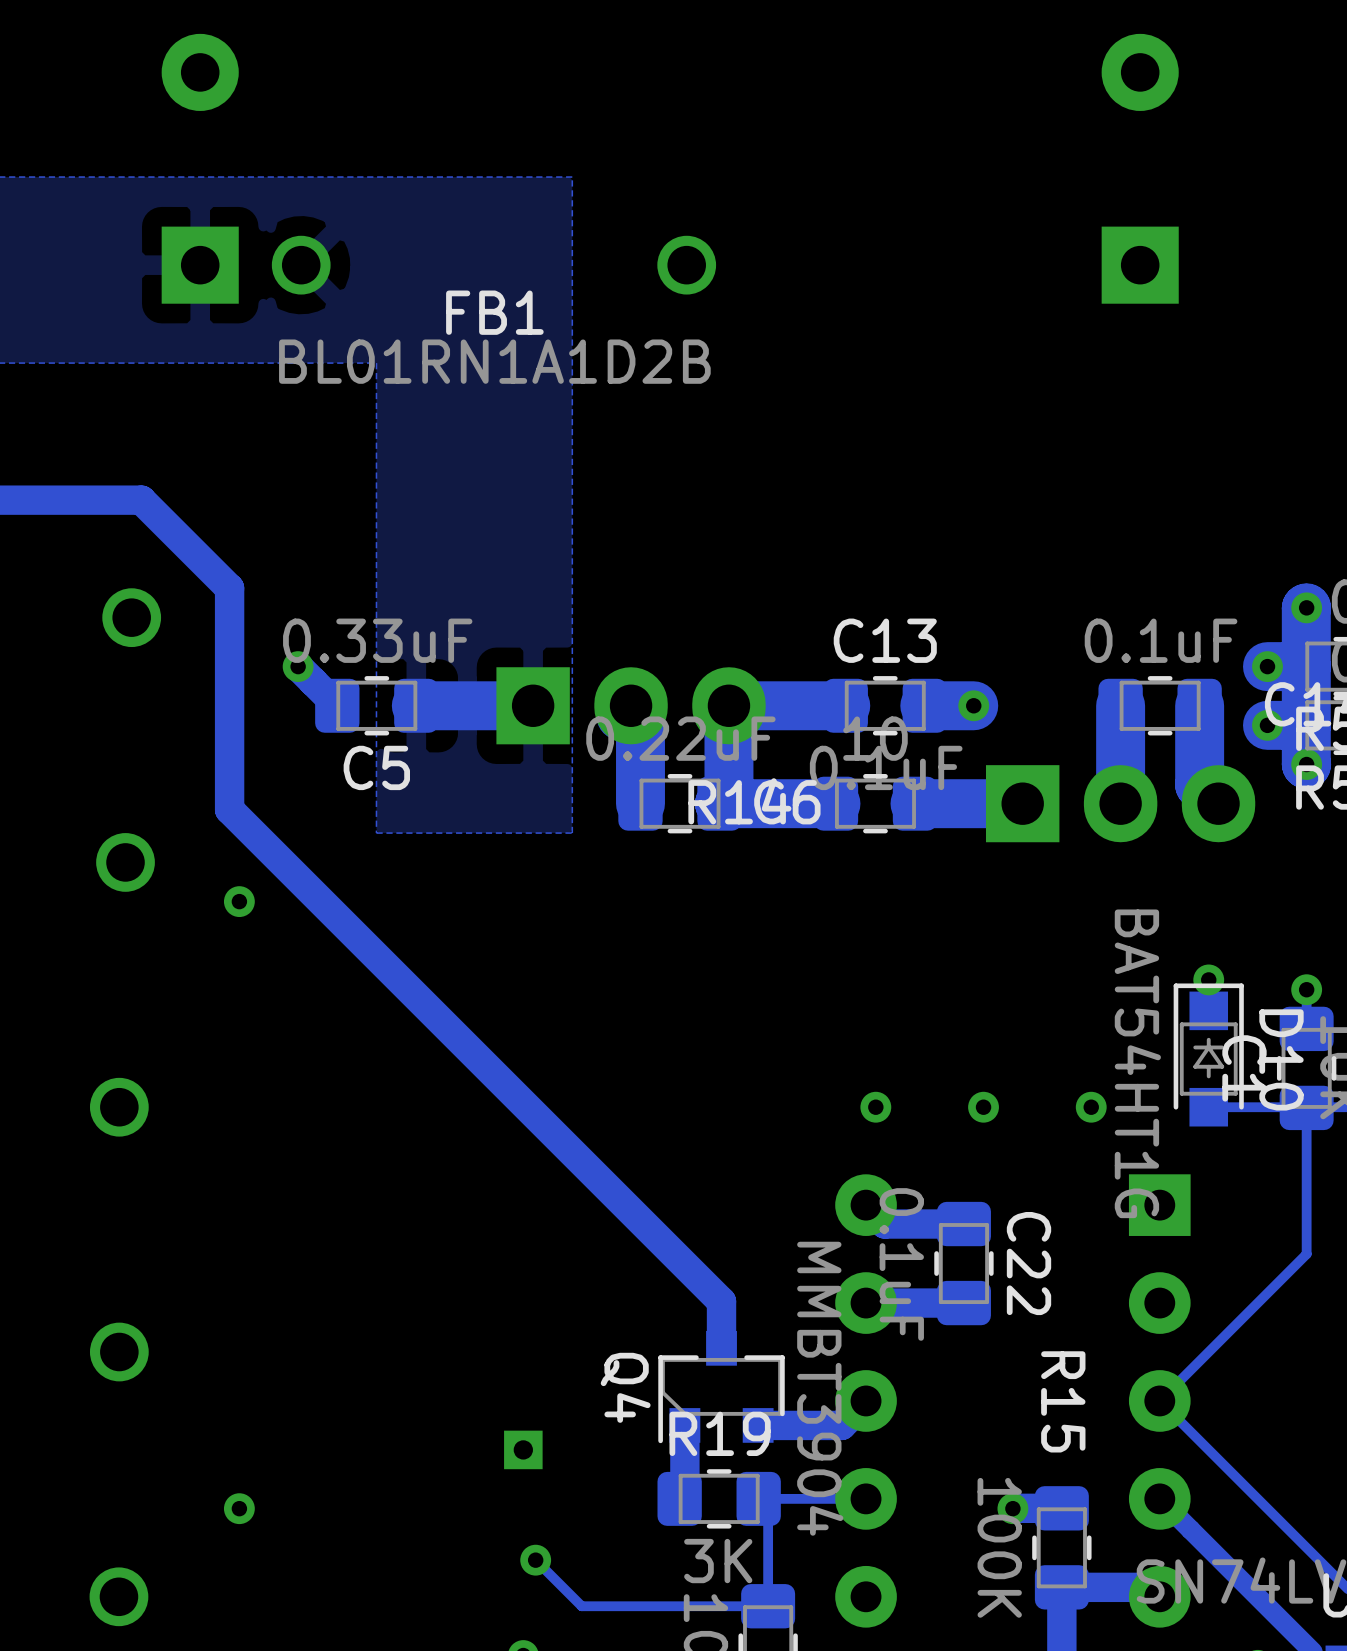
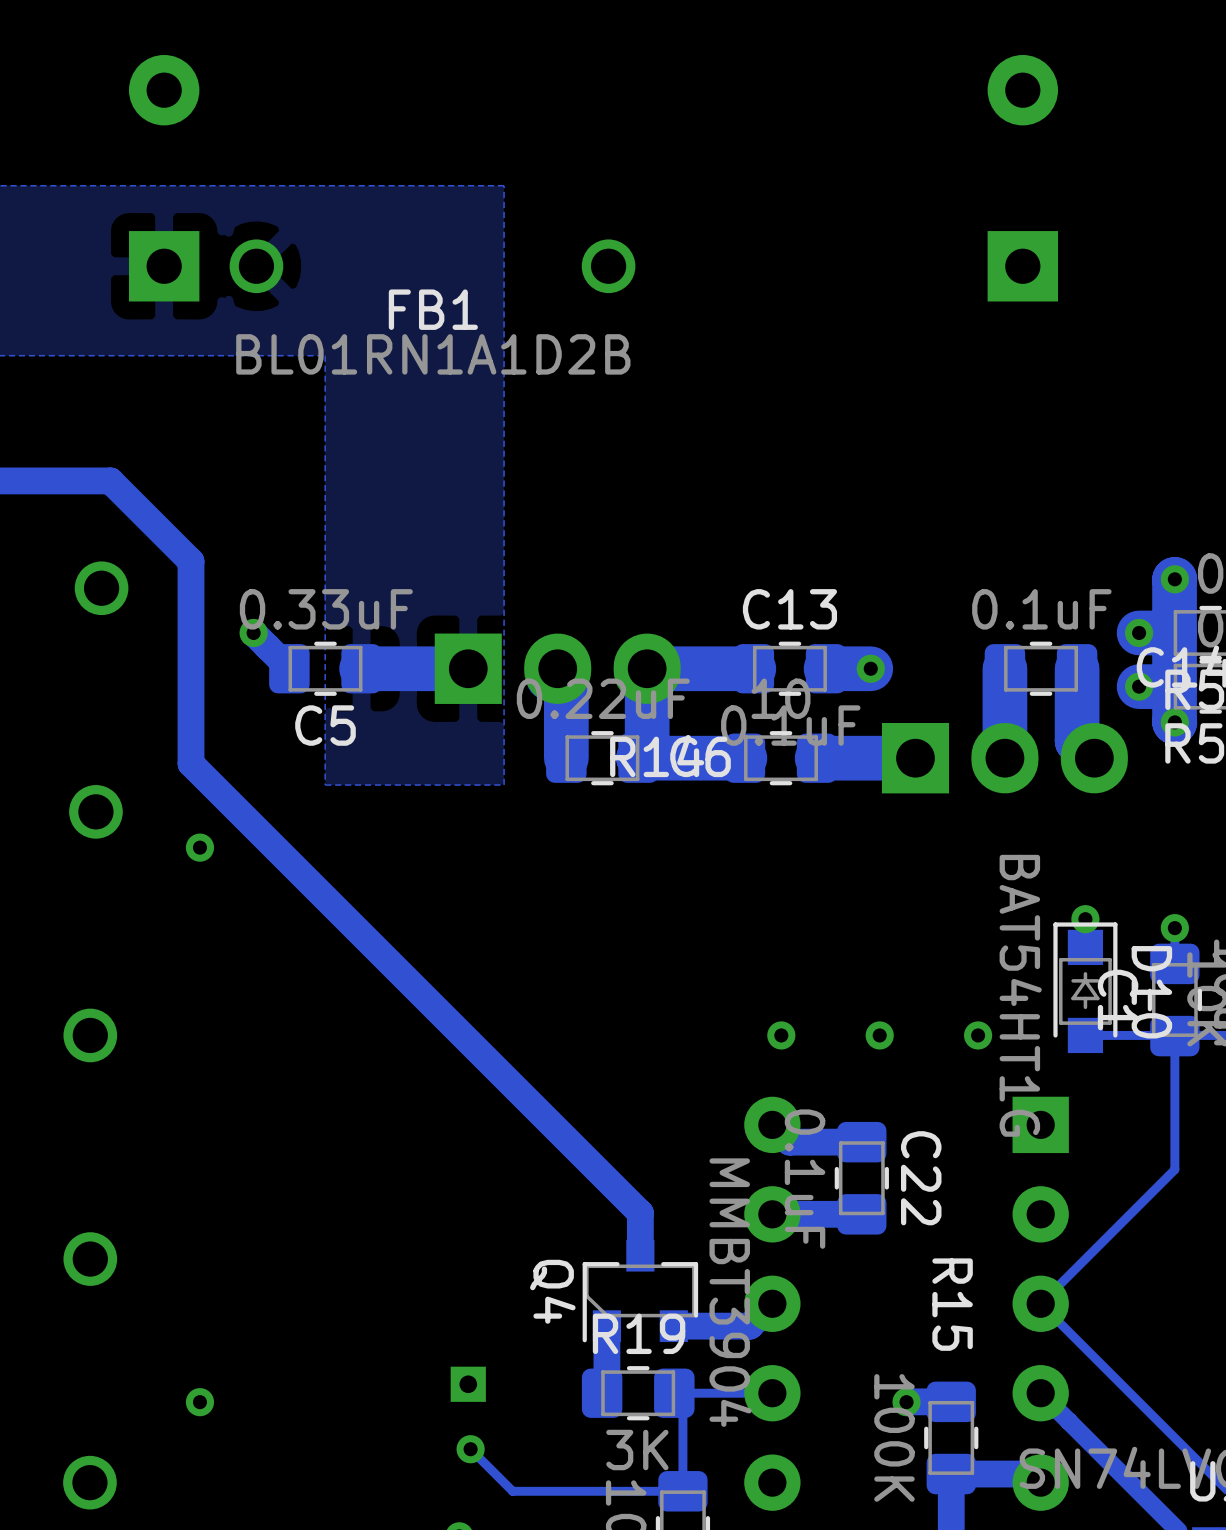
part position: (523, 1449) -> (468, 1384)

